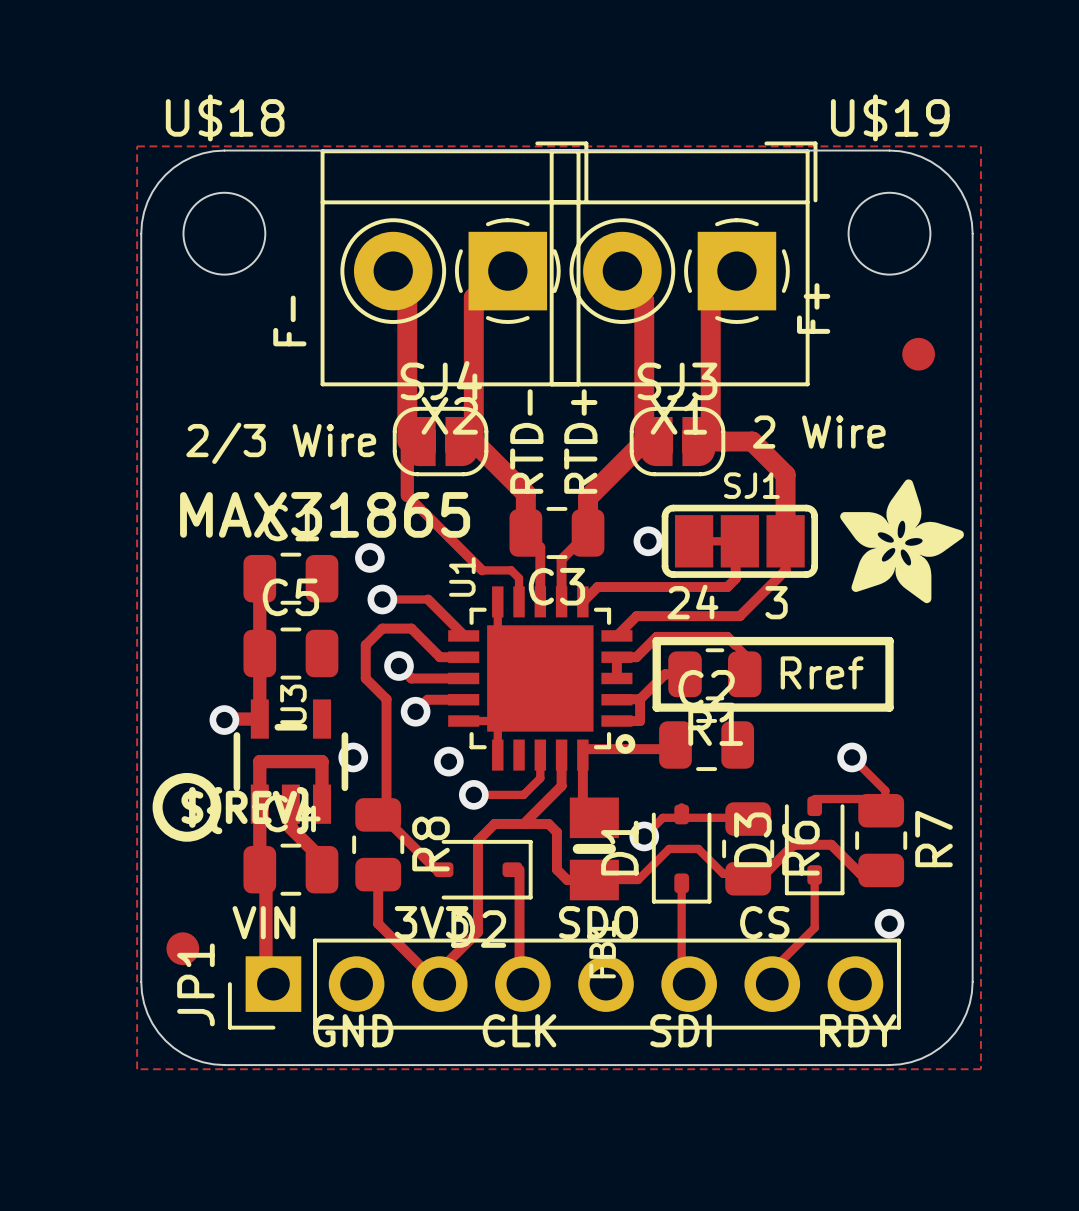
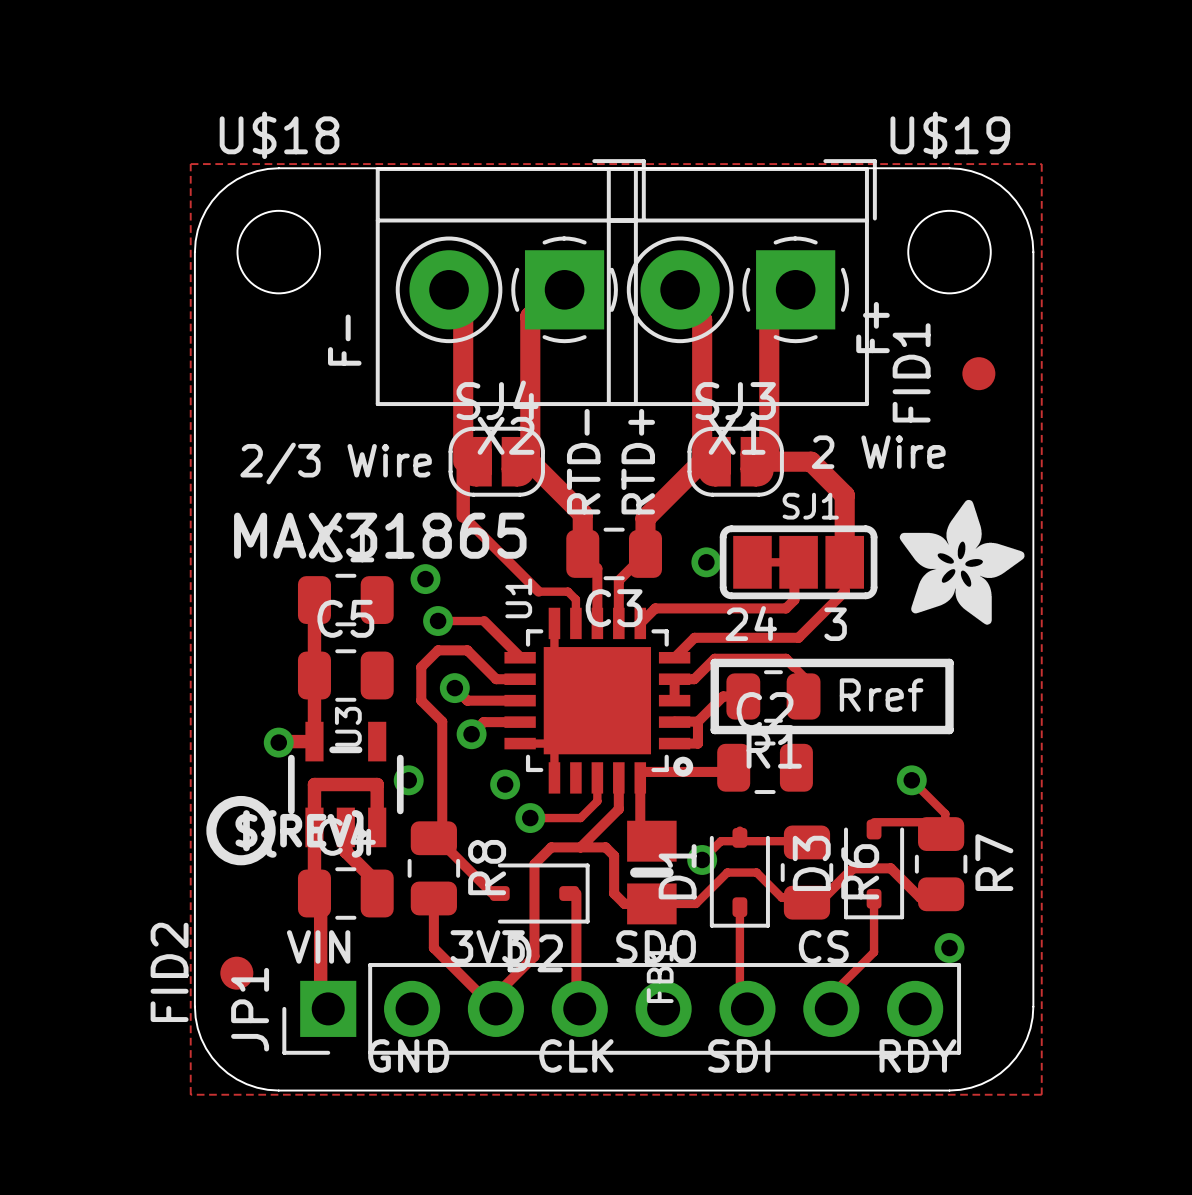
FID1 name: none -> FID1 (911, 372)
FID2 name: none -> FID2 (169, 972)

